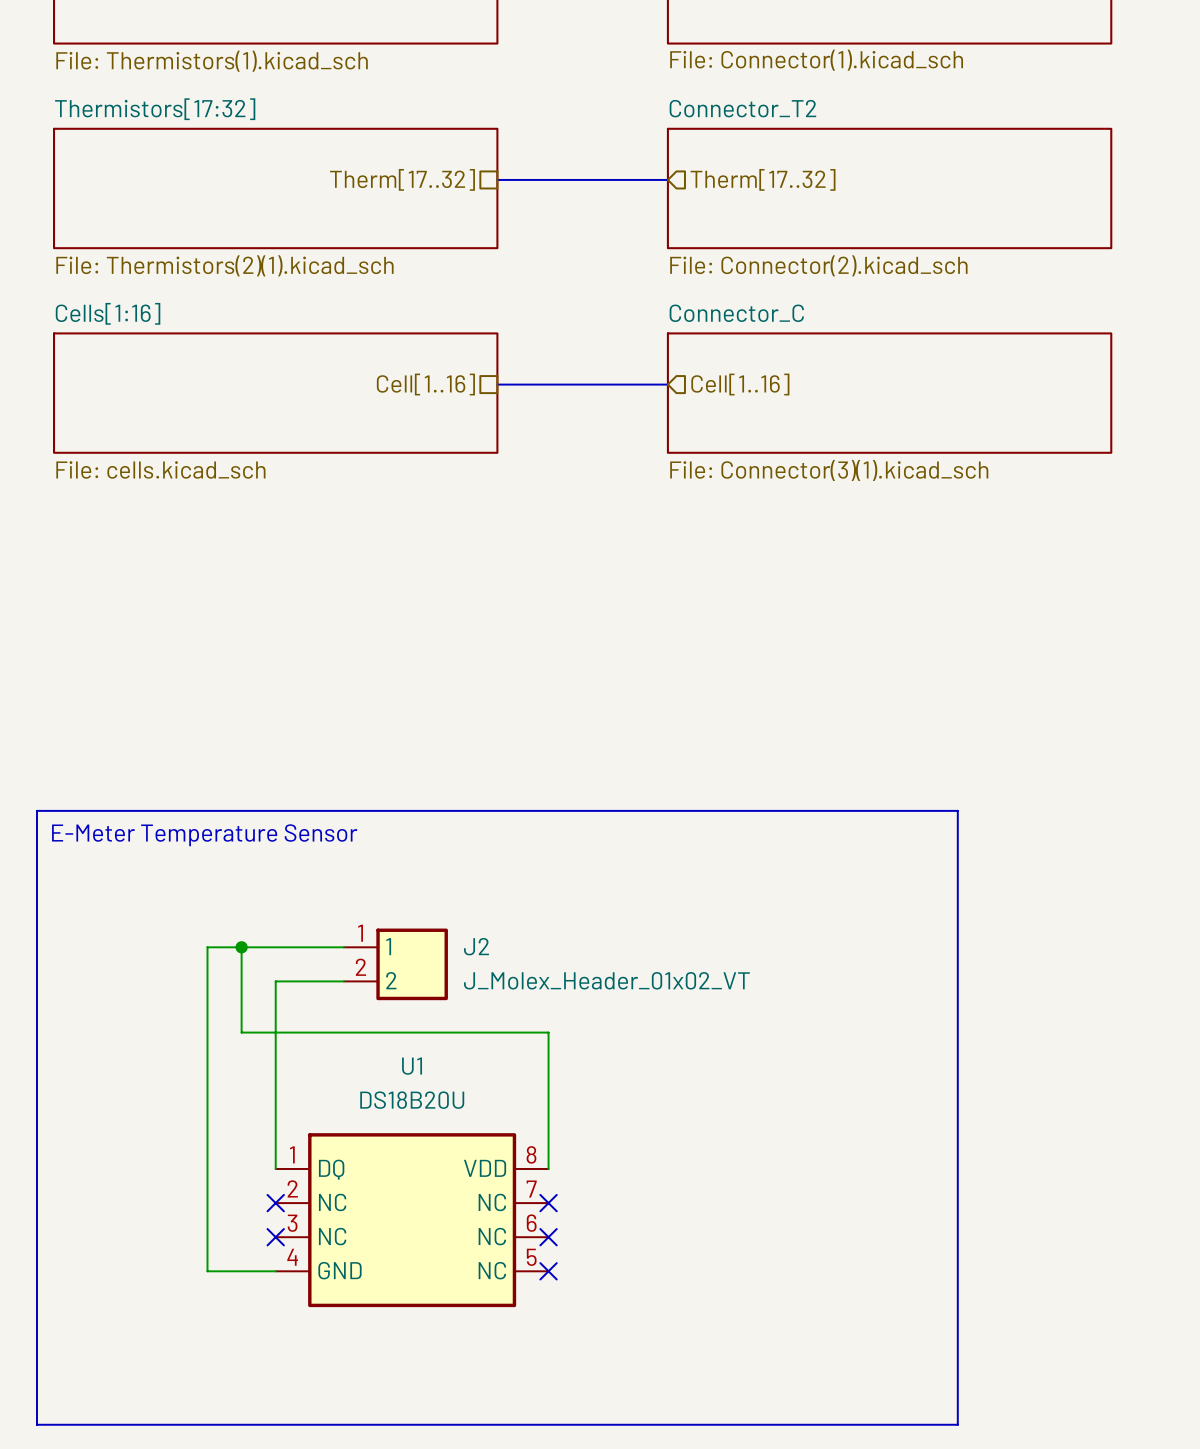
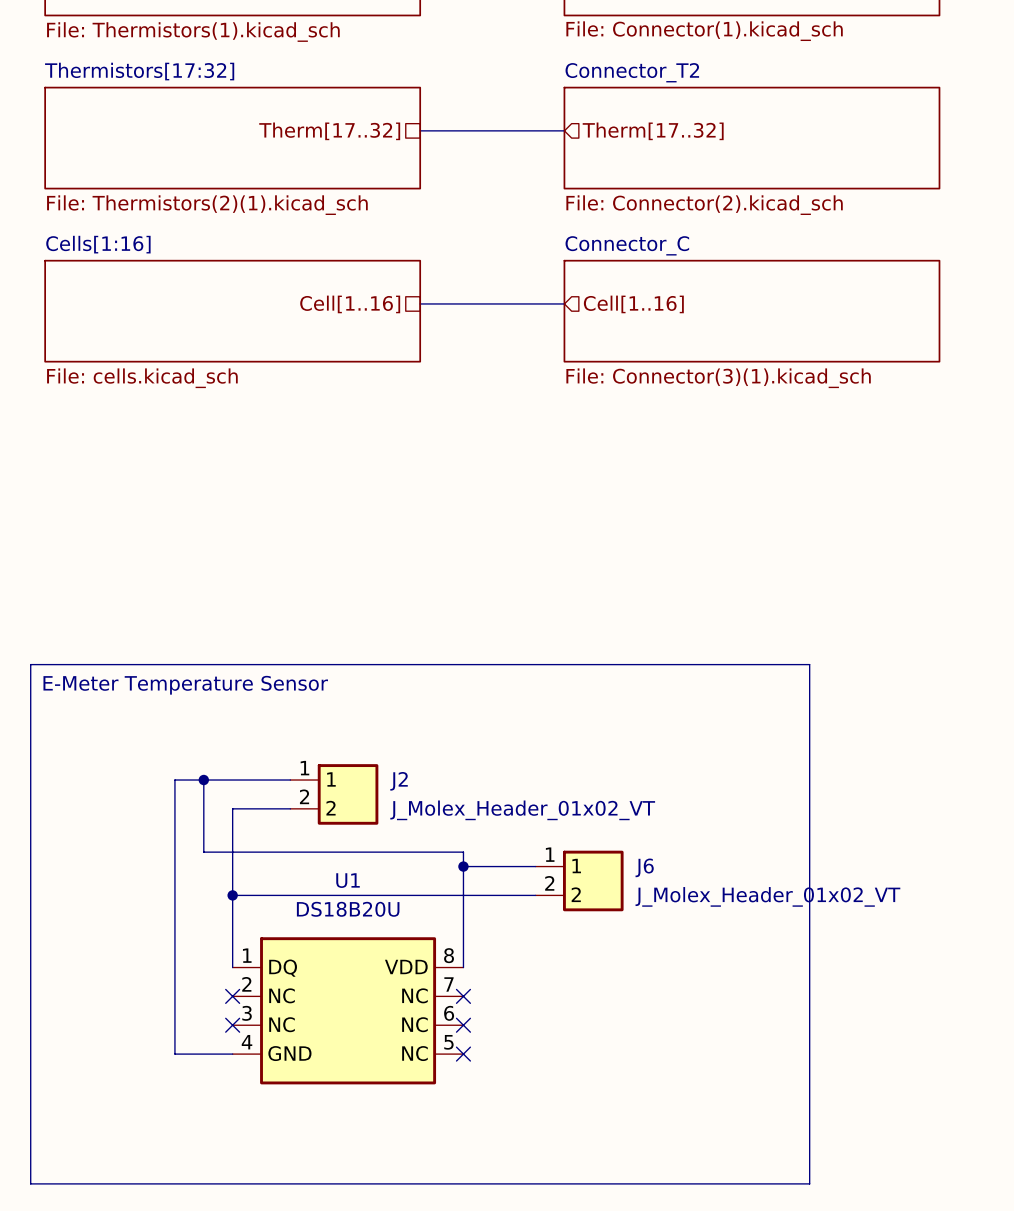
wire: none -> (463, 866) (535, 866)
junction: none -> (463, 866)
J6: none -> J_Molex_Header_01x02_VT (579, 880)
wire: none -> (232, 895) (535, 895)
junction: none -> (232, 895)

